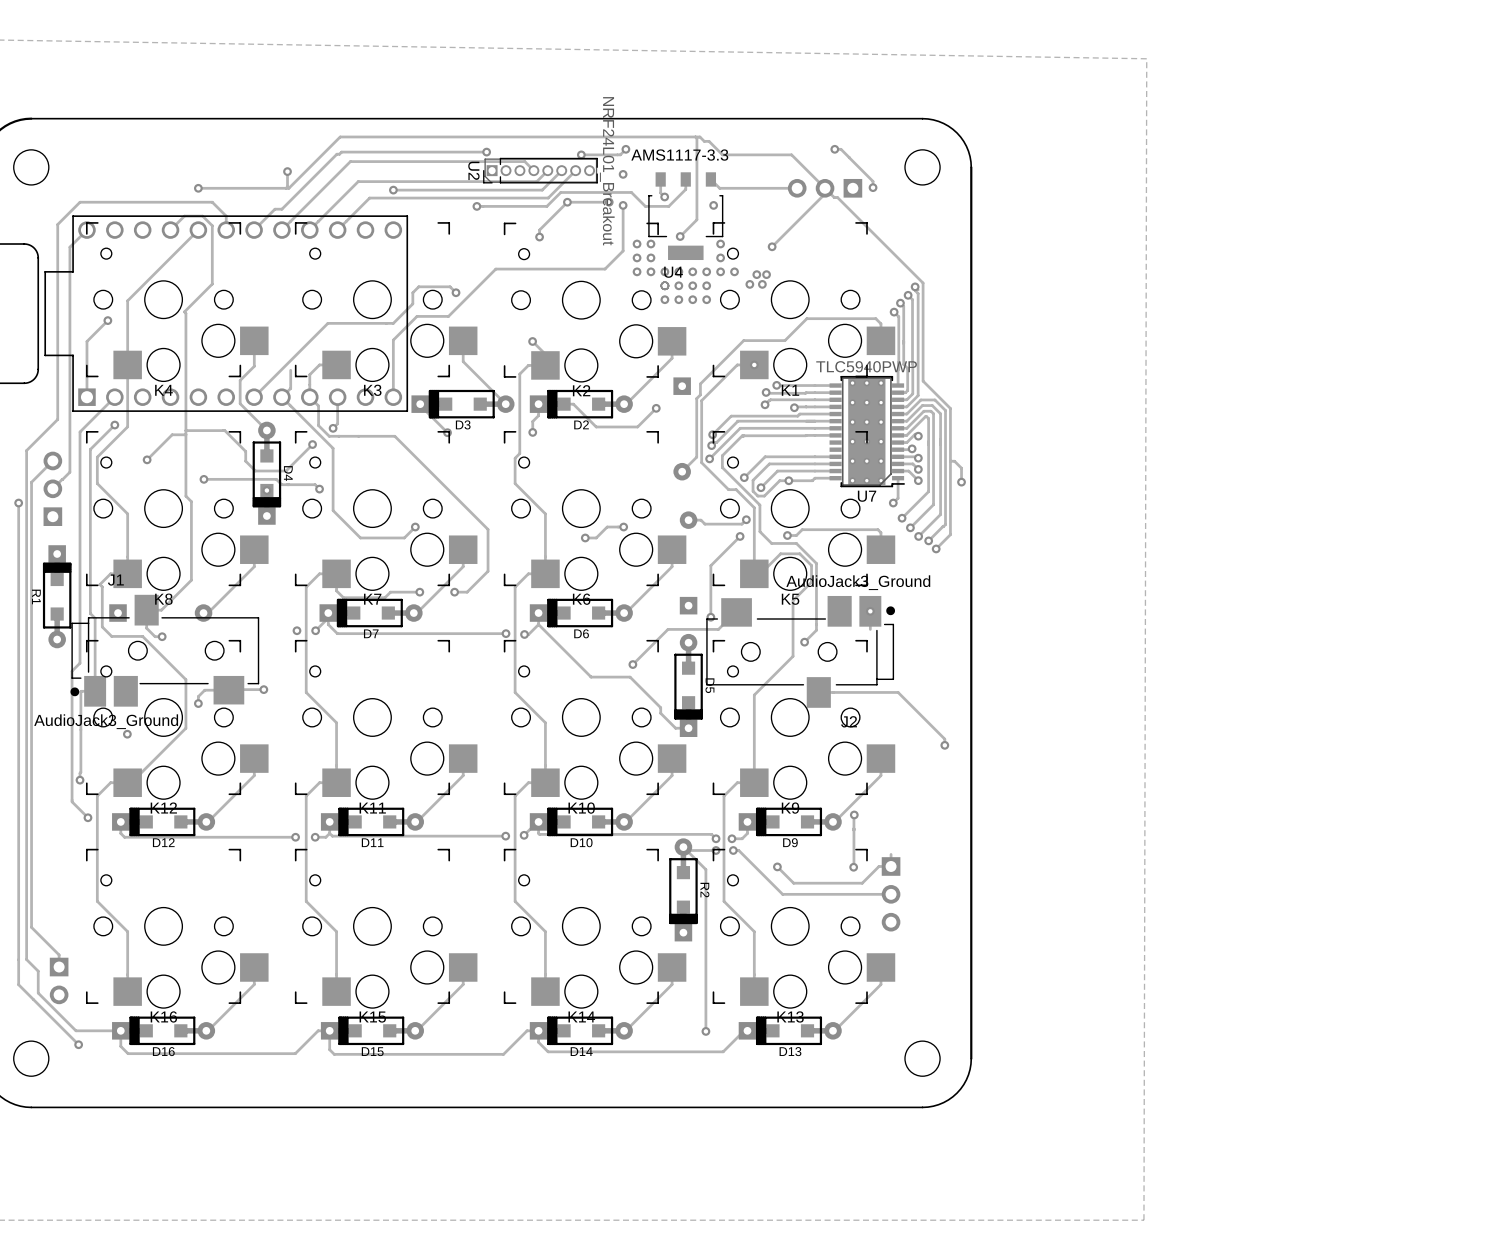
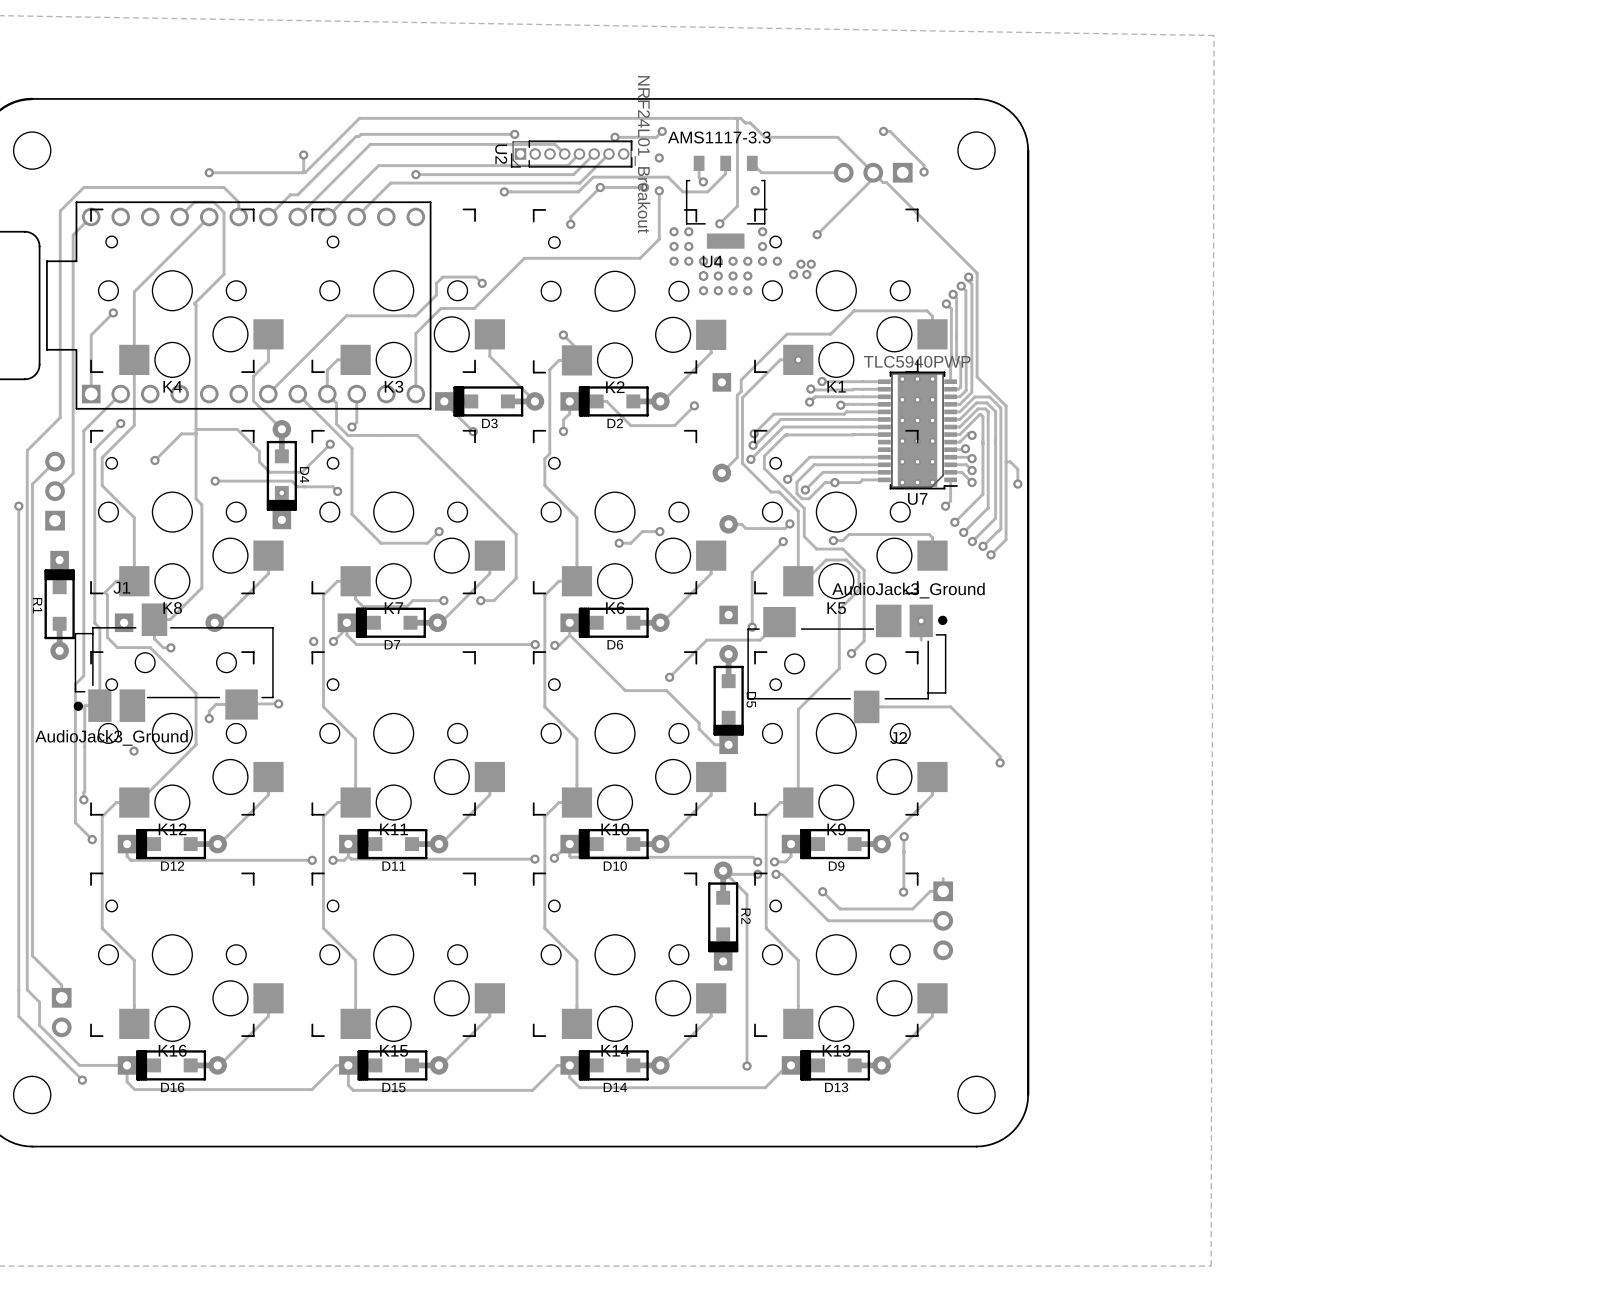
track: (290, 370) (290, 388) (281, 397) -> none

